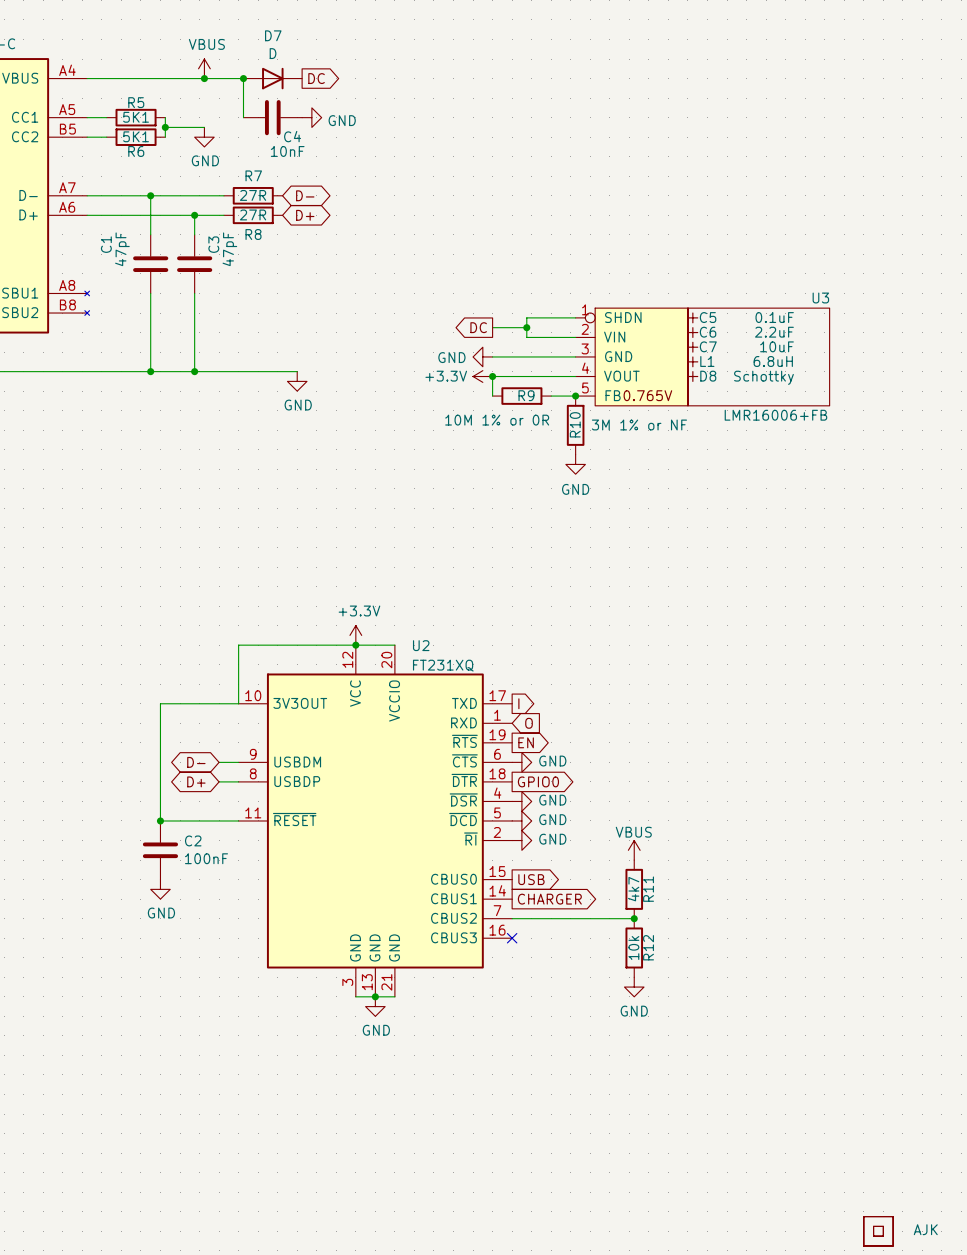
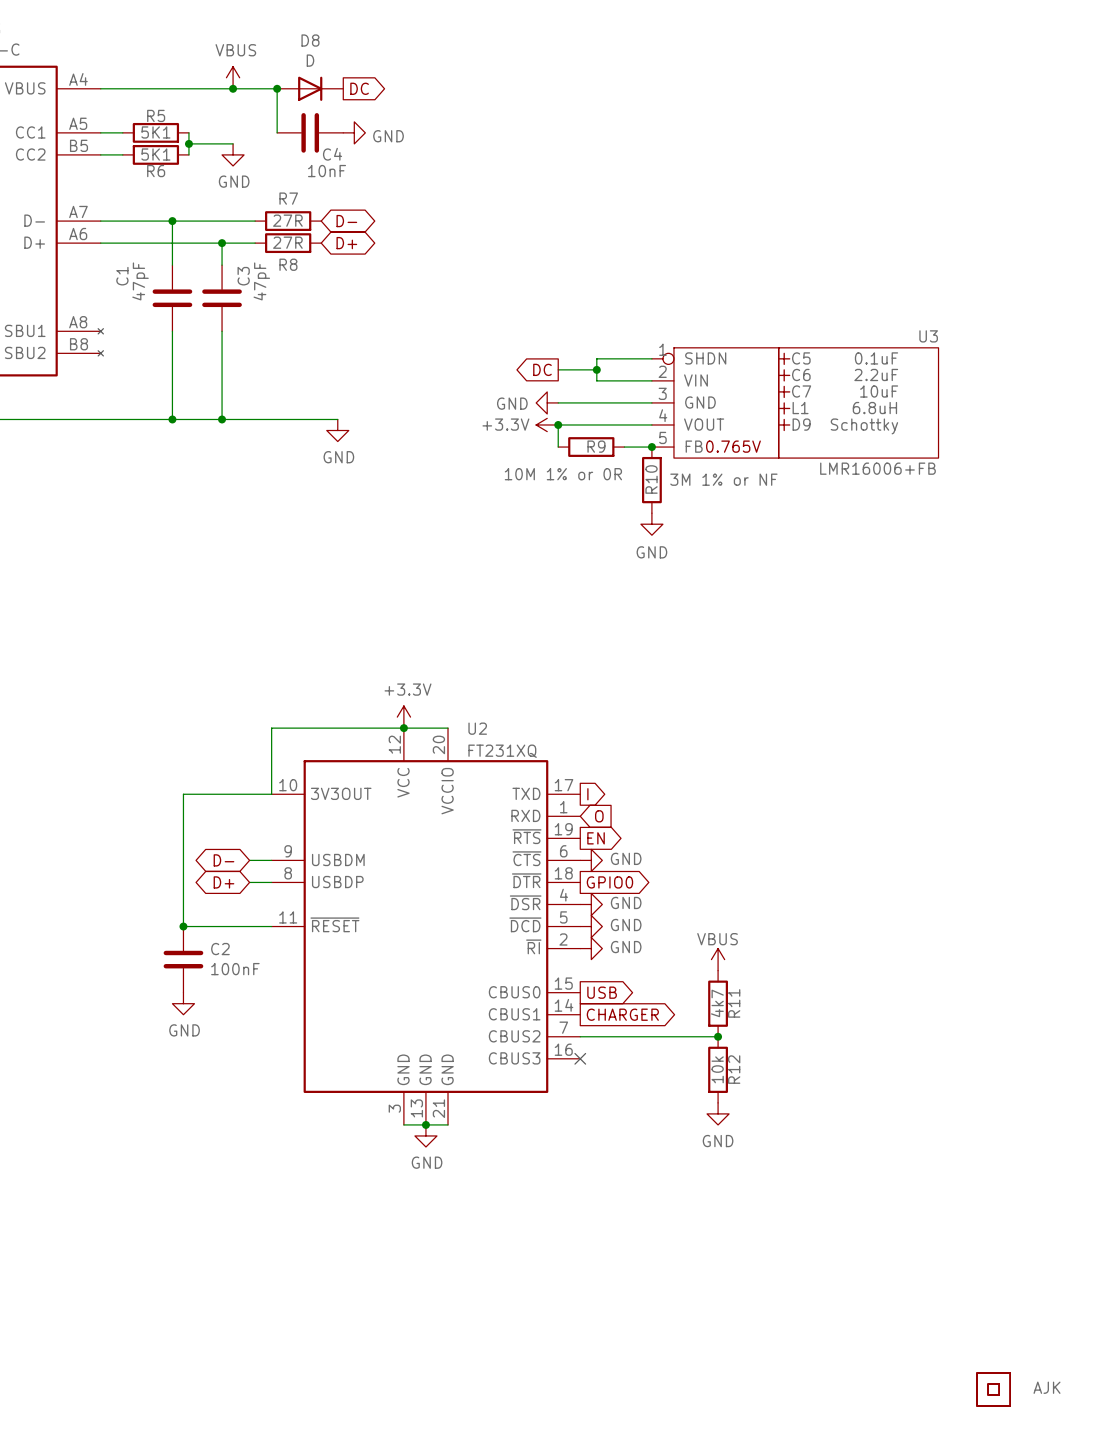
D7 name: D7 (273, 35) -> D8 (310, 40)
D8 name: D8 (708, 376) -> D9 (801, 424)

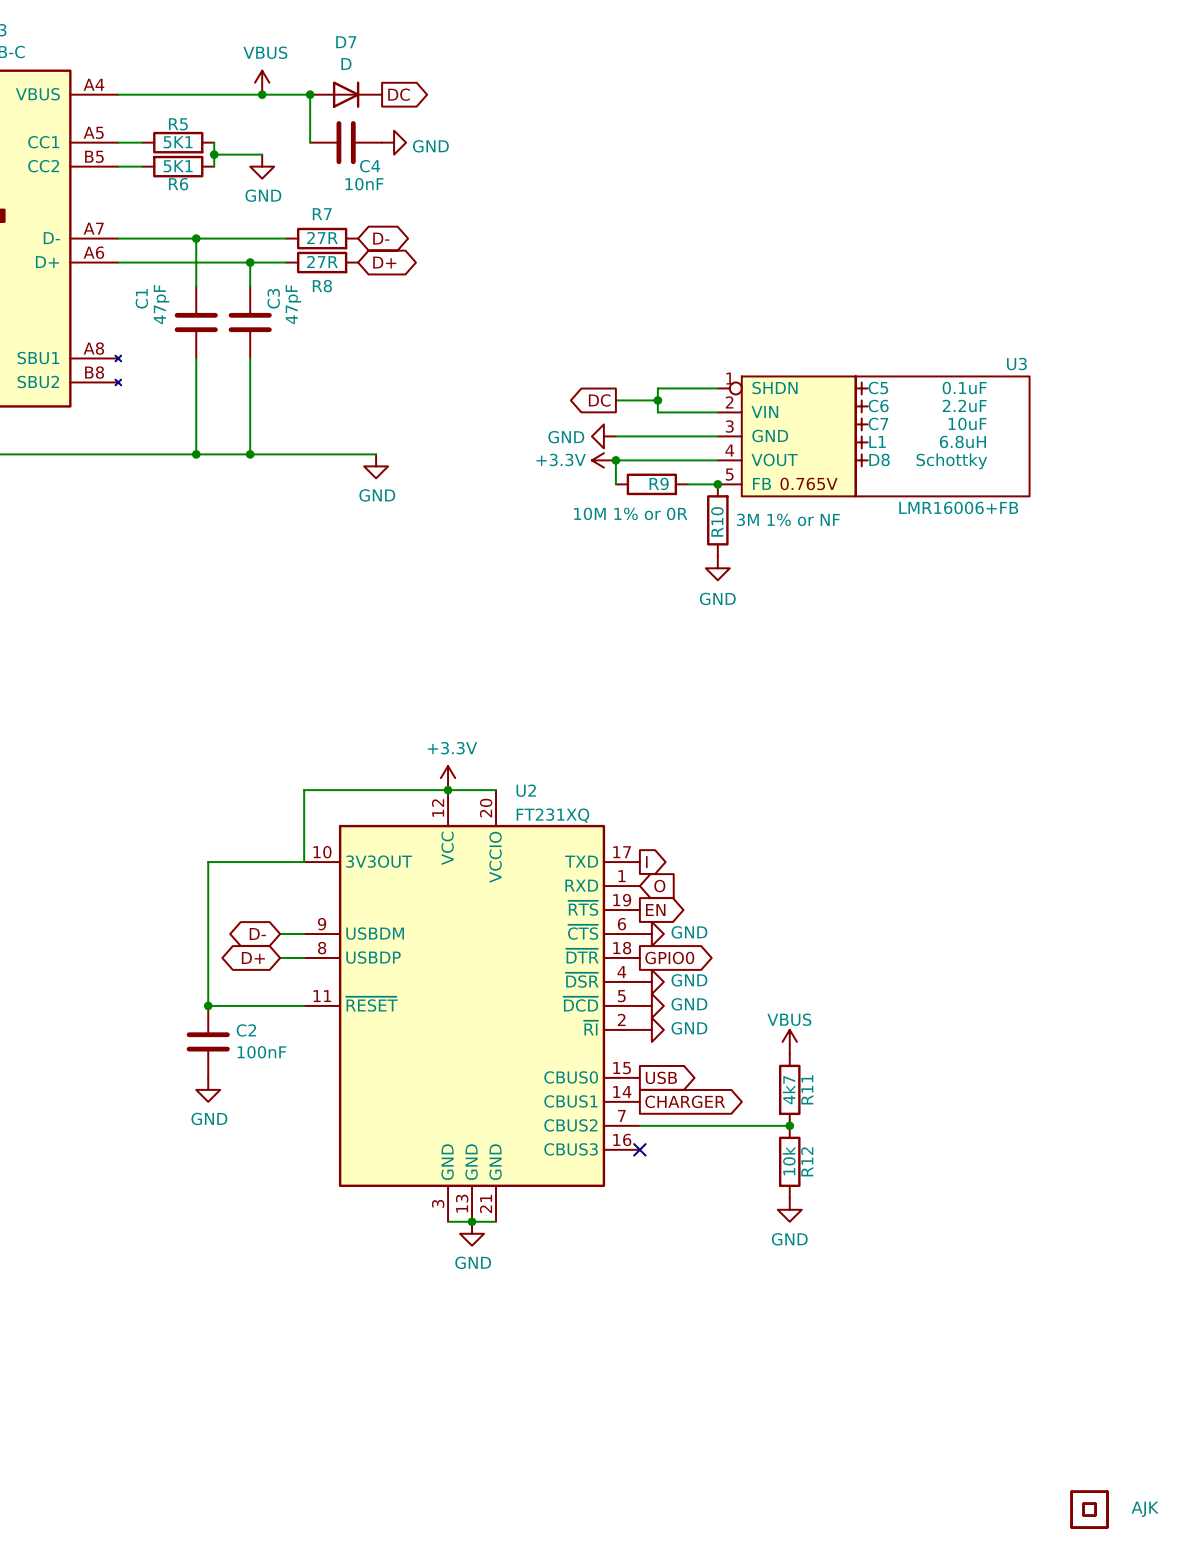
D8 name: D8 (310, 40) -> D7 (346, 42)
D9 name: D9 (801, 424) -> D8 (879, 459)

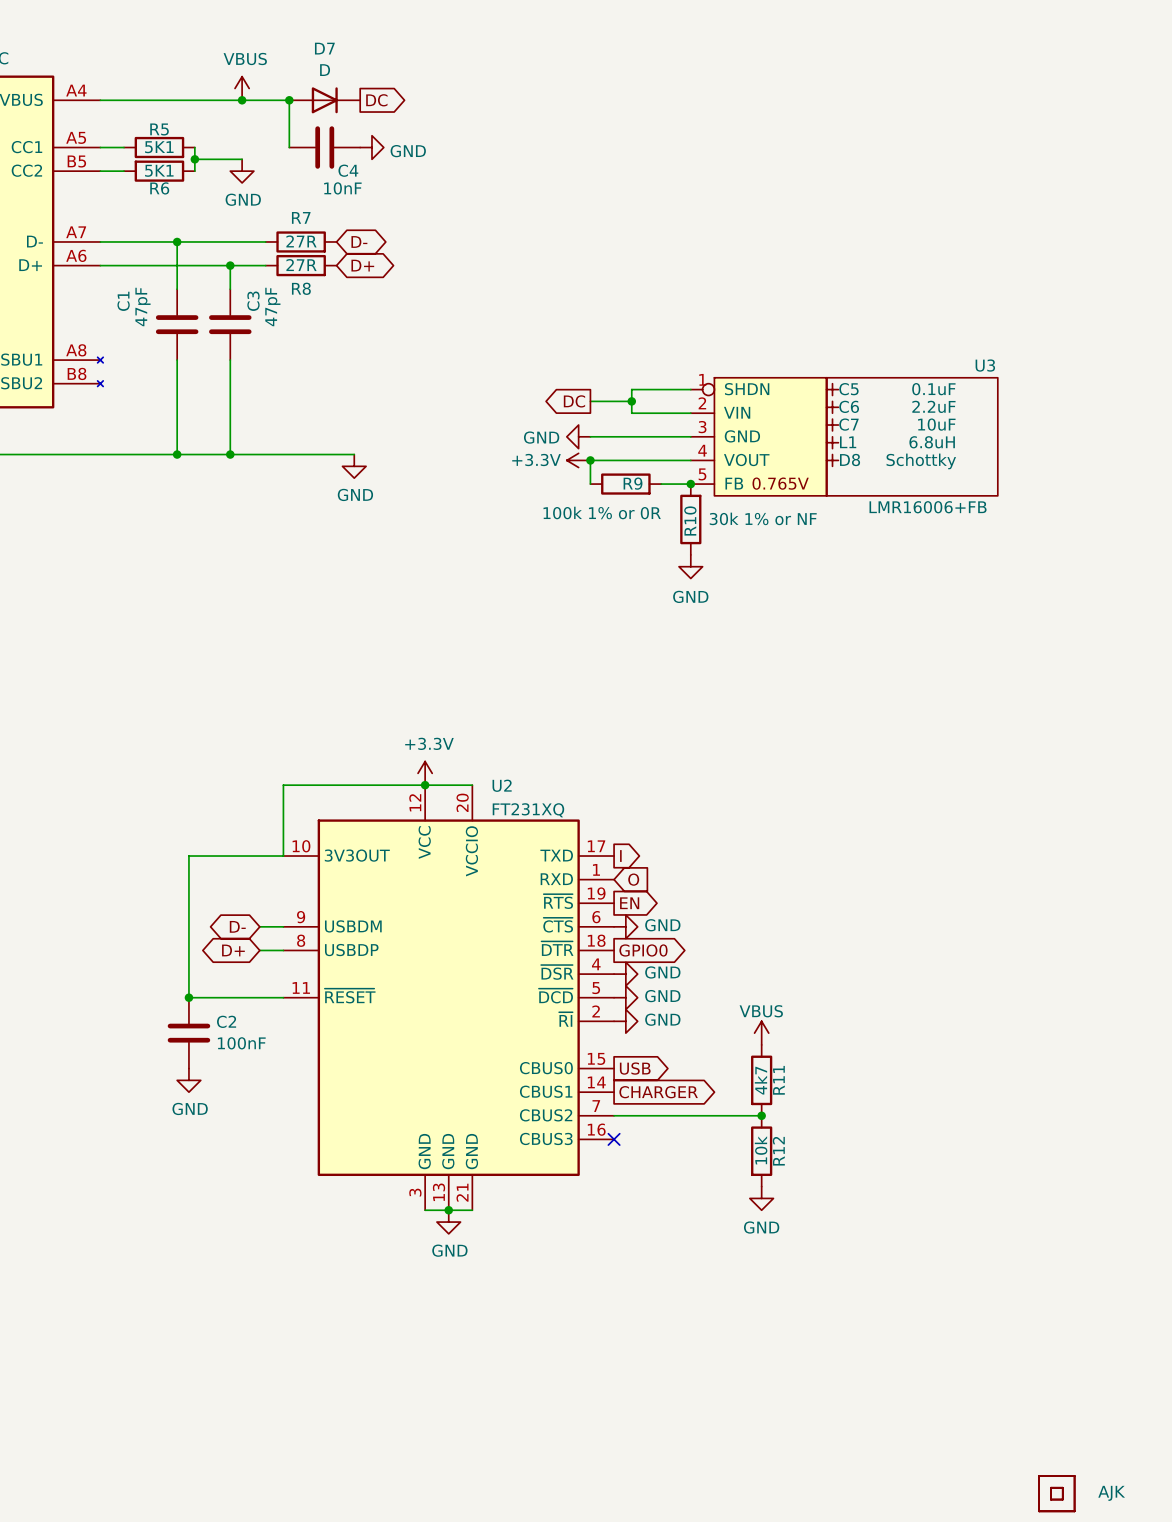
R9 value: 10M 1% or 0R (630, 513) -> 100k 1% or 0R (602, 513)
R10 value: 3M 1% or NF (788, 519) -> 30k 1% or NF (763, 518)

